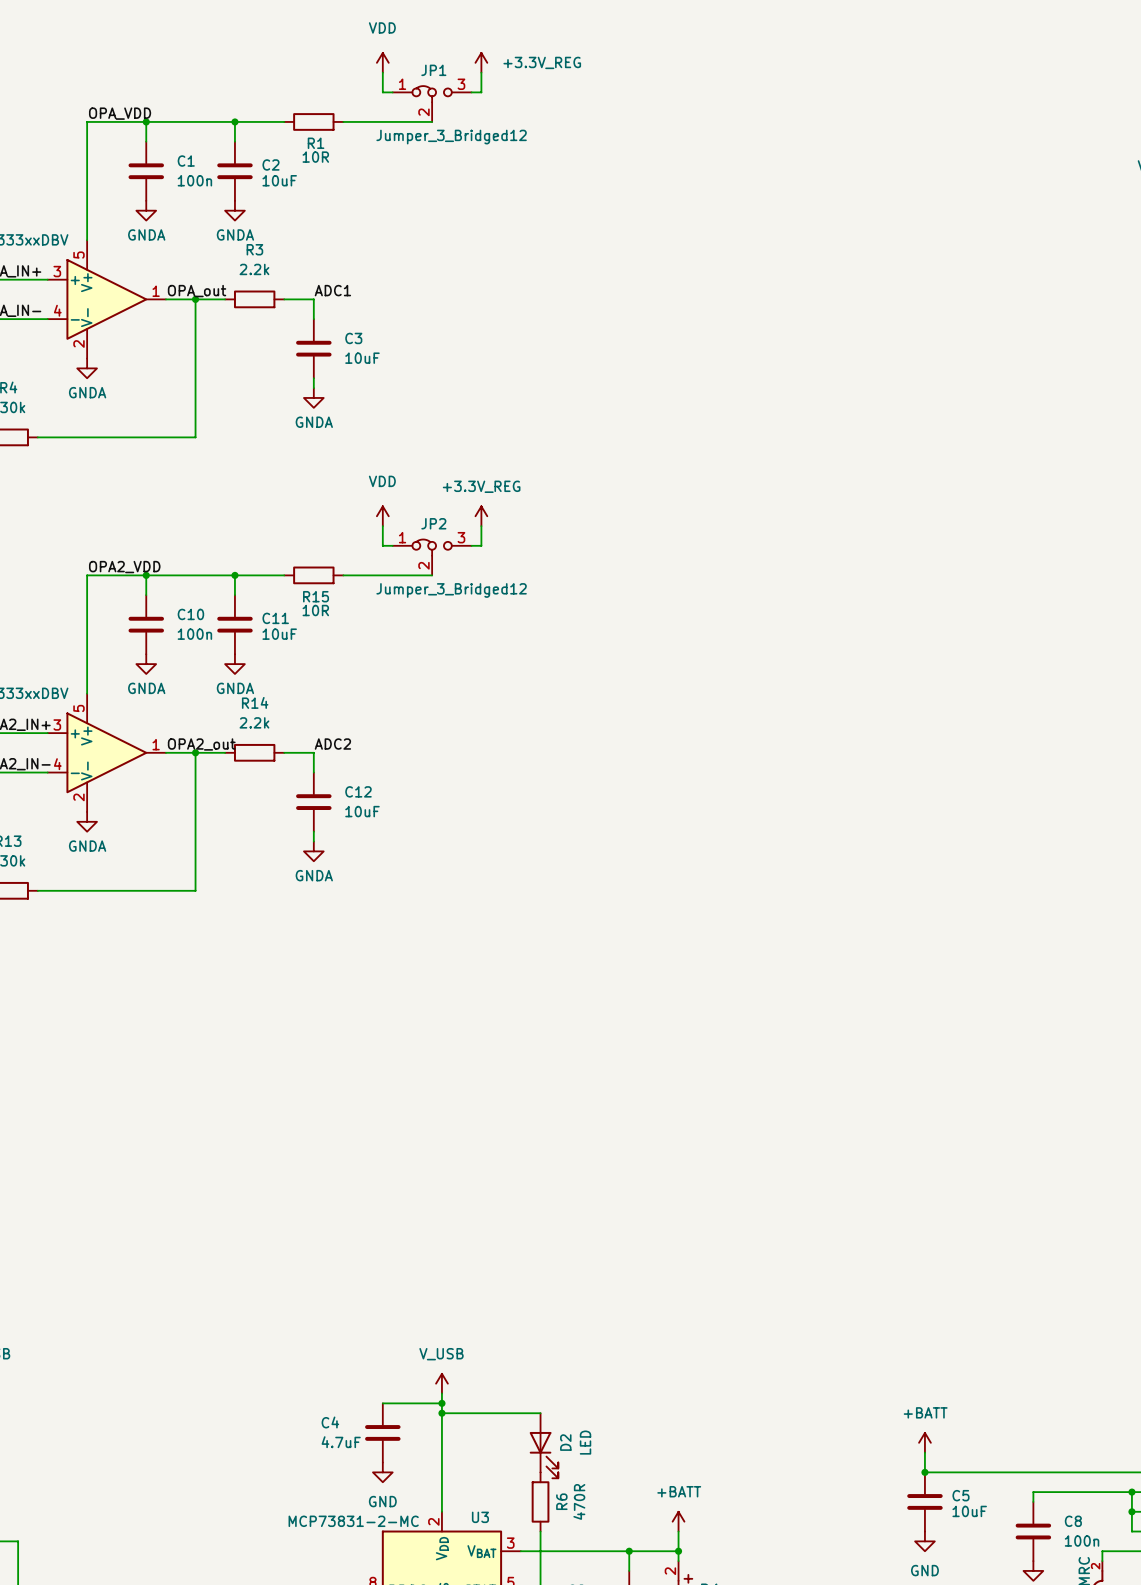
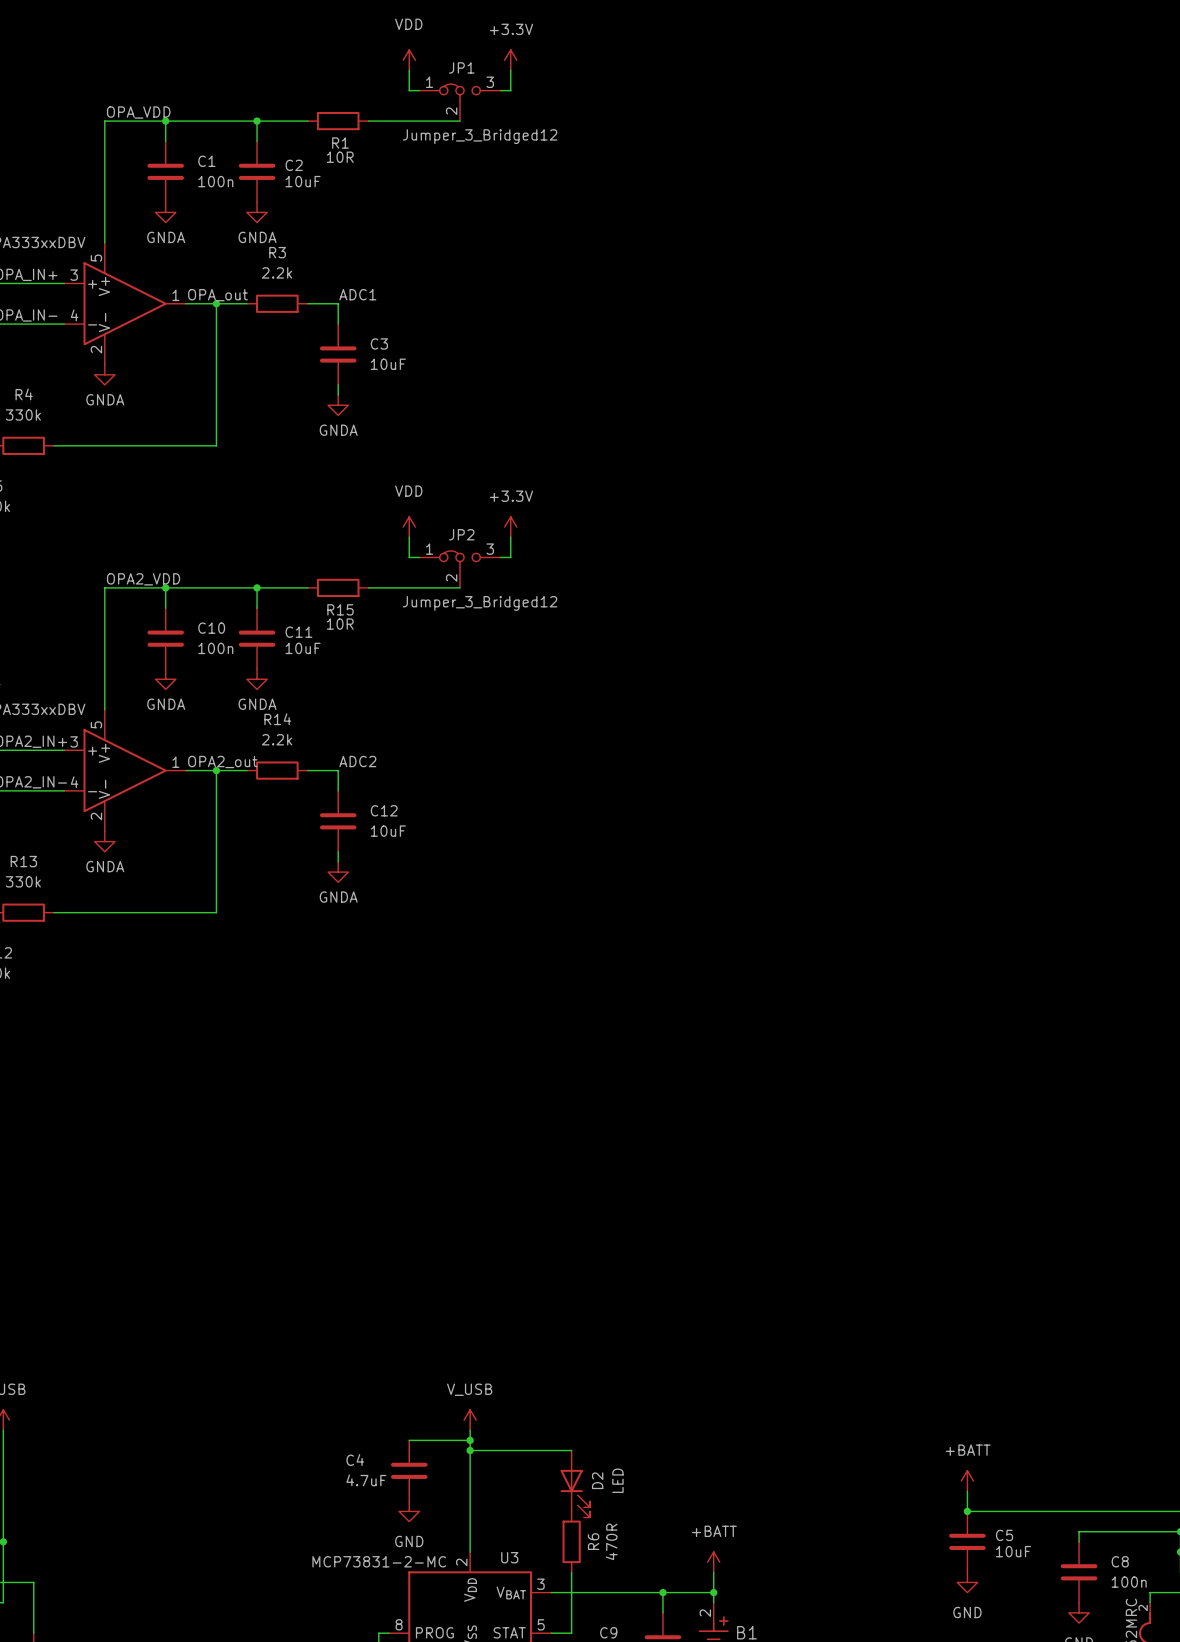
power symbol: +3.3V_REG (481, 62) -> +3.3V (510, 60)
power symbol: +3.3V_REG (481, 516) -> +3.3V (510, 527)

